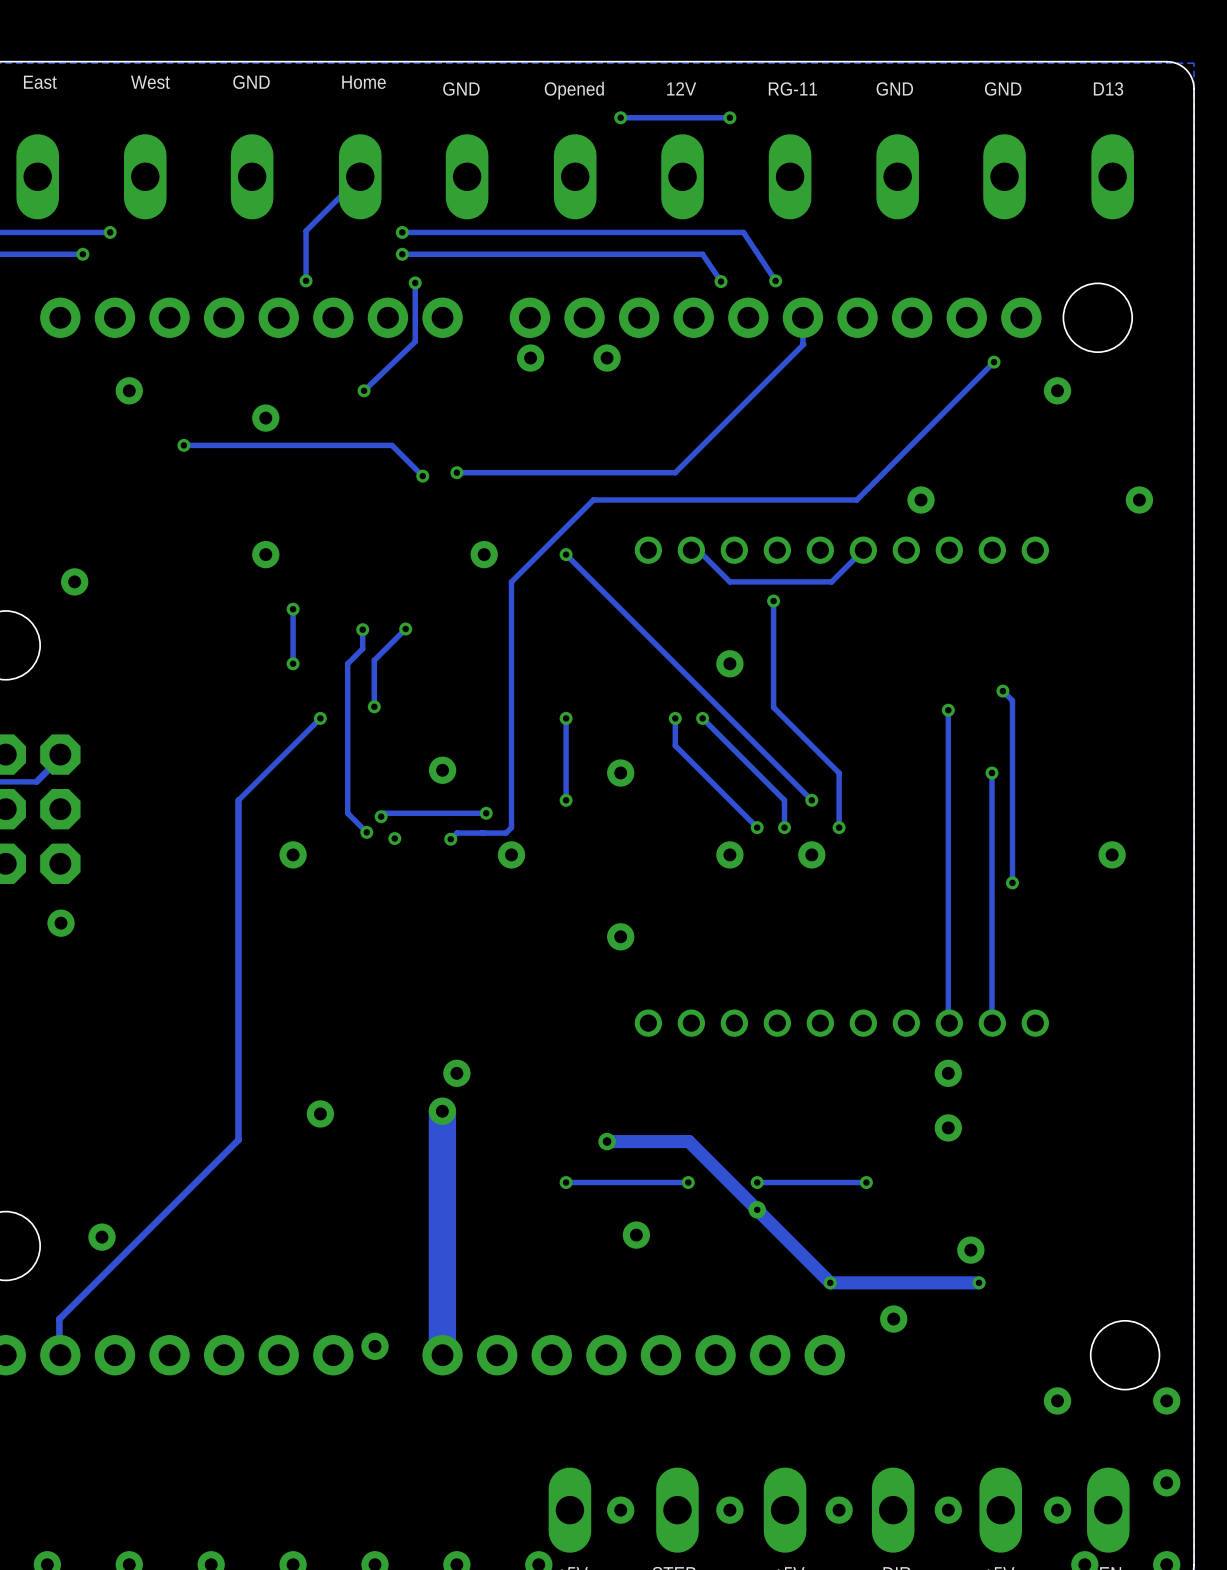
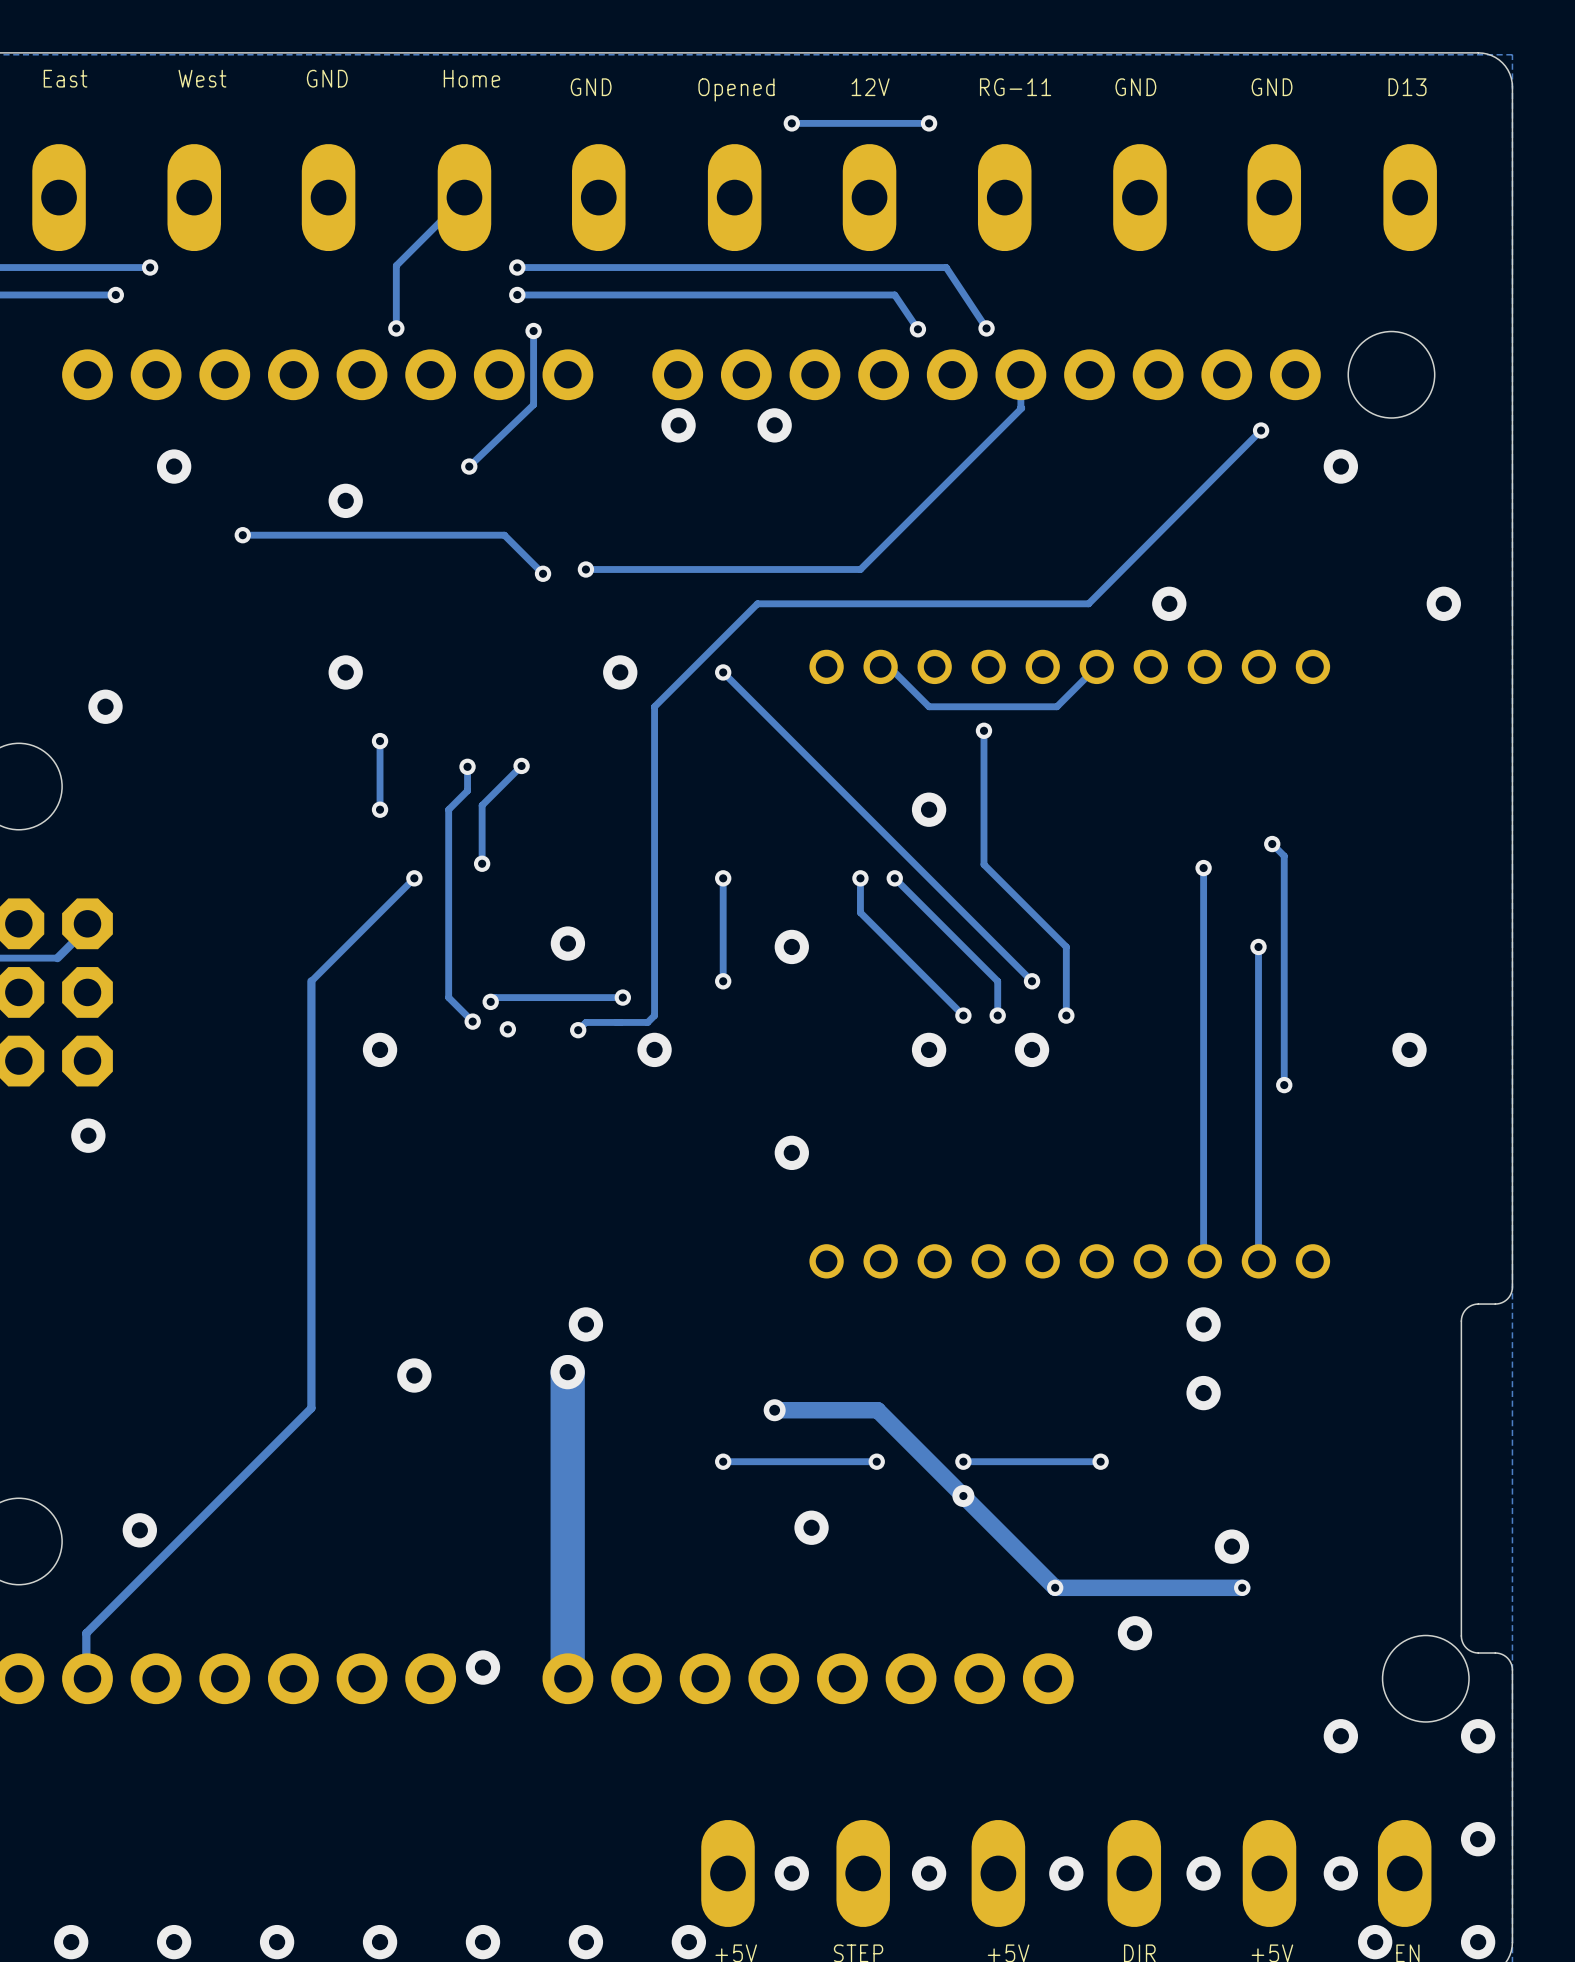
board edge: (1194, 1043) (1194, 1348) -> (1512, 1287) (1510, 1295) (1503, 1301) (1471, 1305) (1463, 1312) (1461, 1321) (1461, 1638) (1464, 1646) (1471, 1651) (1503, 1655) (1510, 1661) (1512, 1670)

